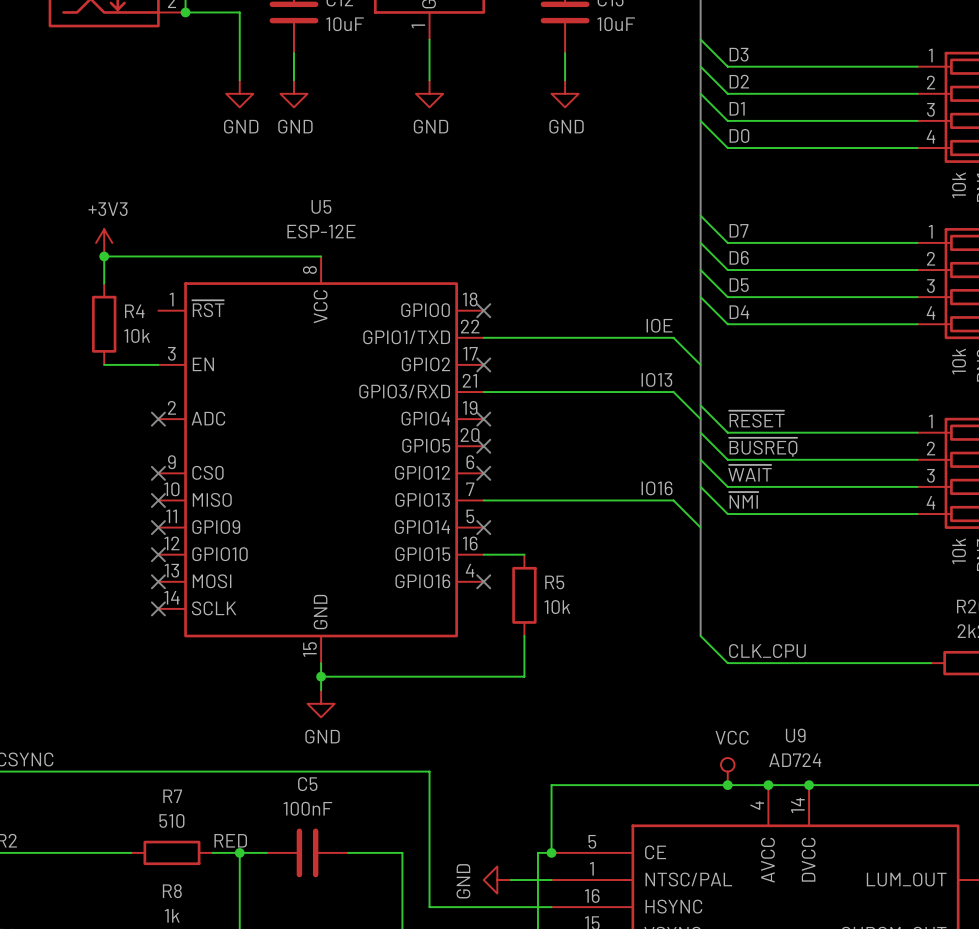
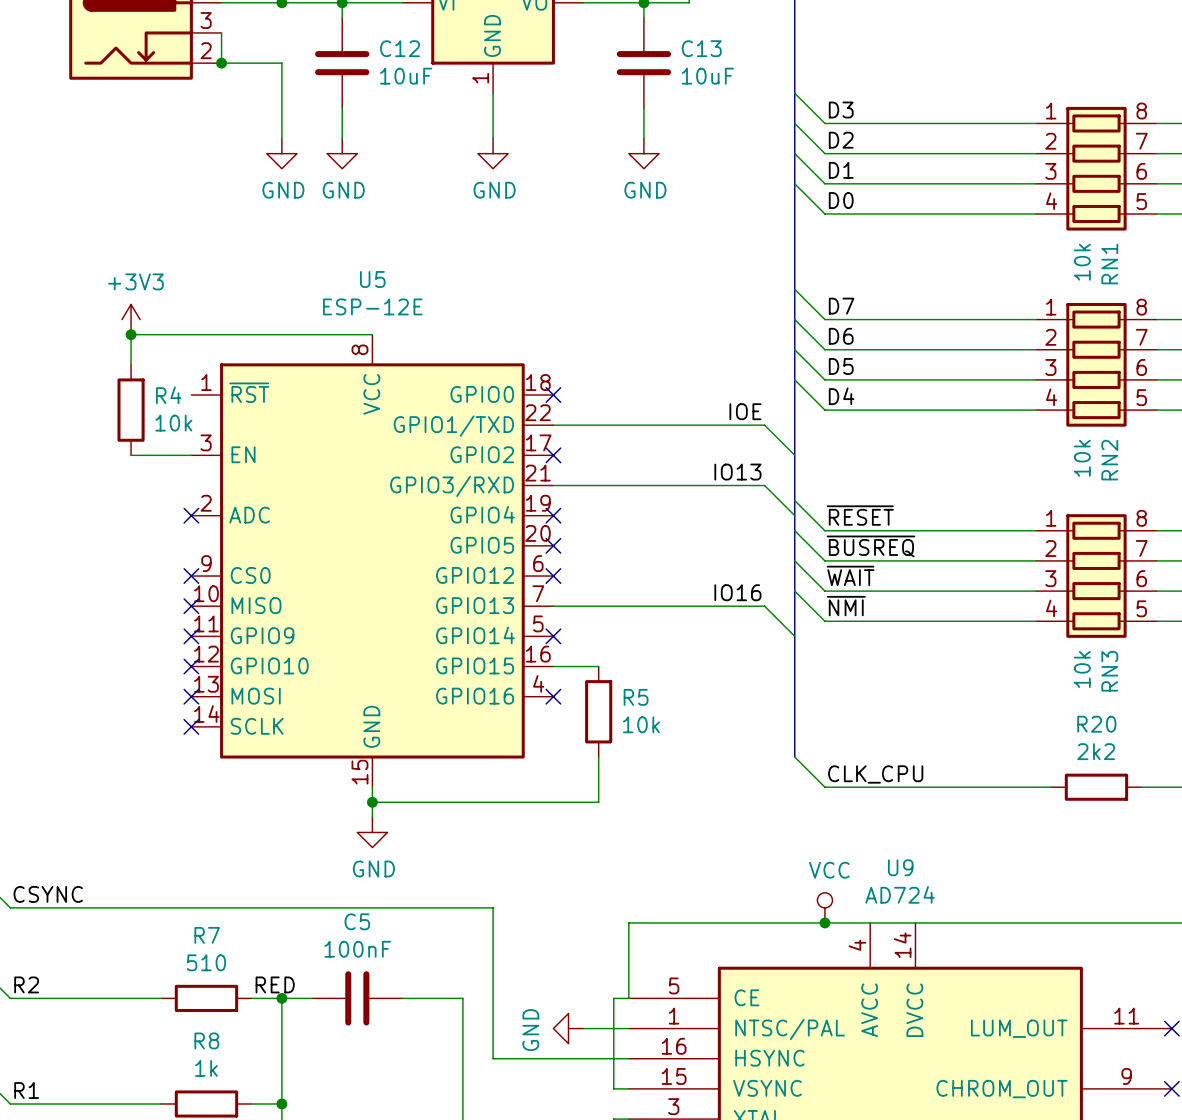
junction: (768, 785) -> none
junction: (809, 785) -> none
junction: (551, 852) -> none

